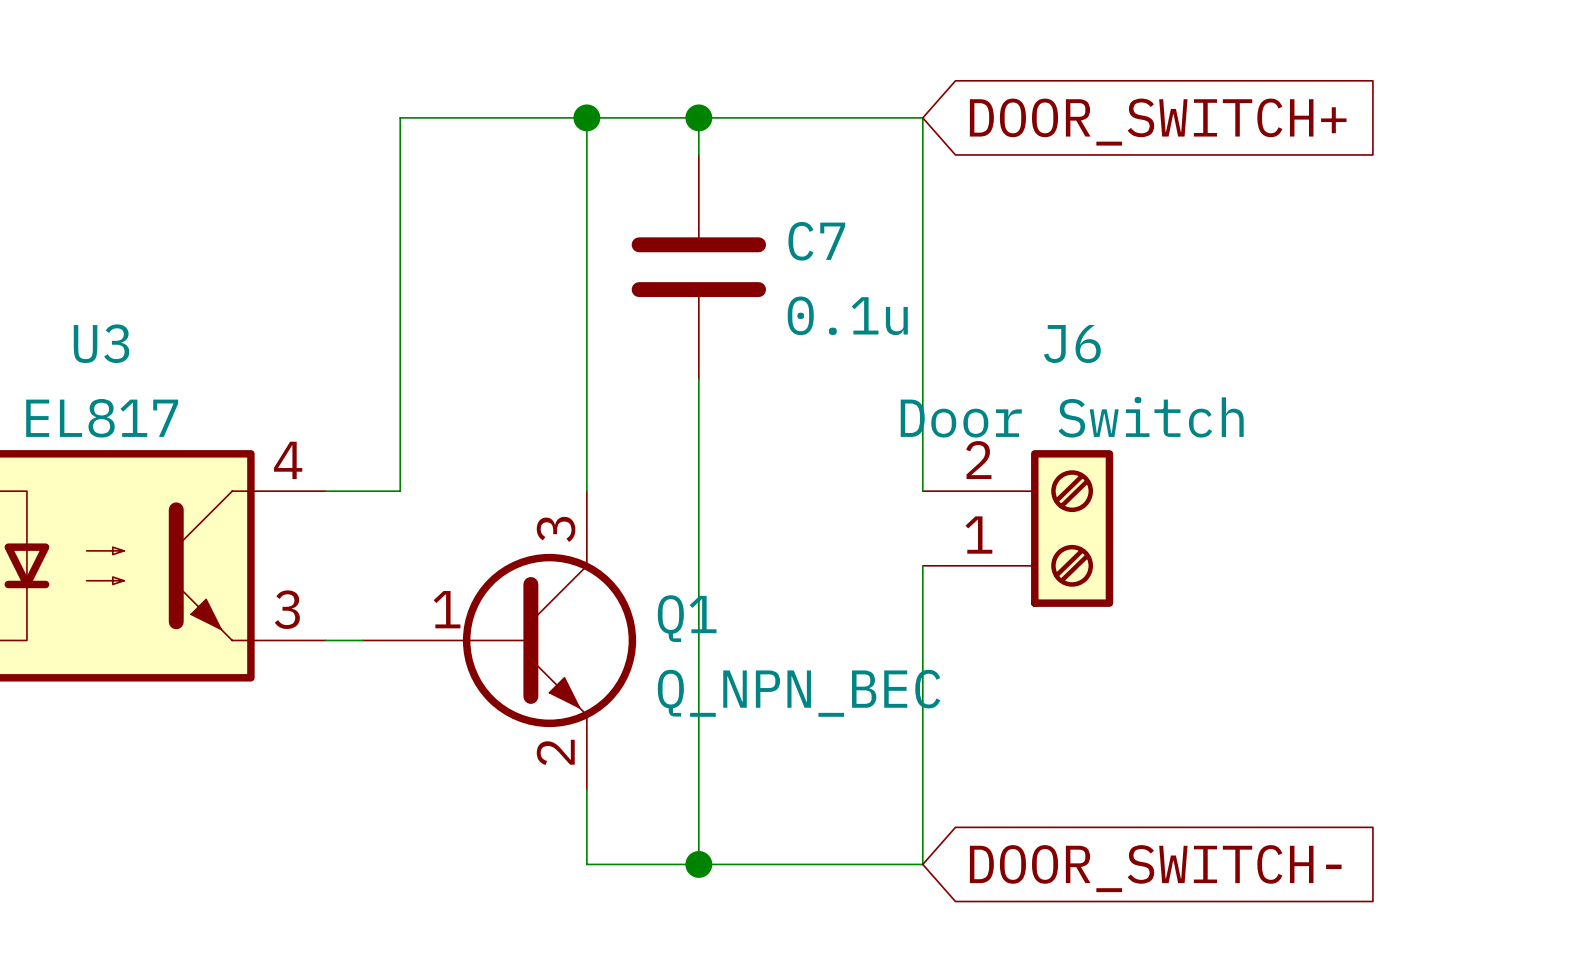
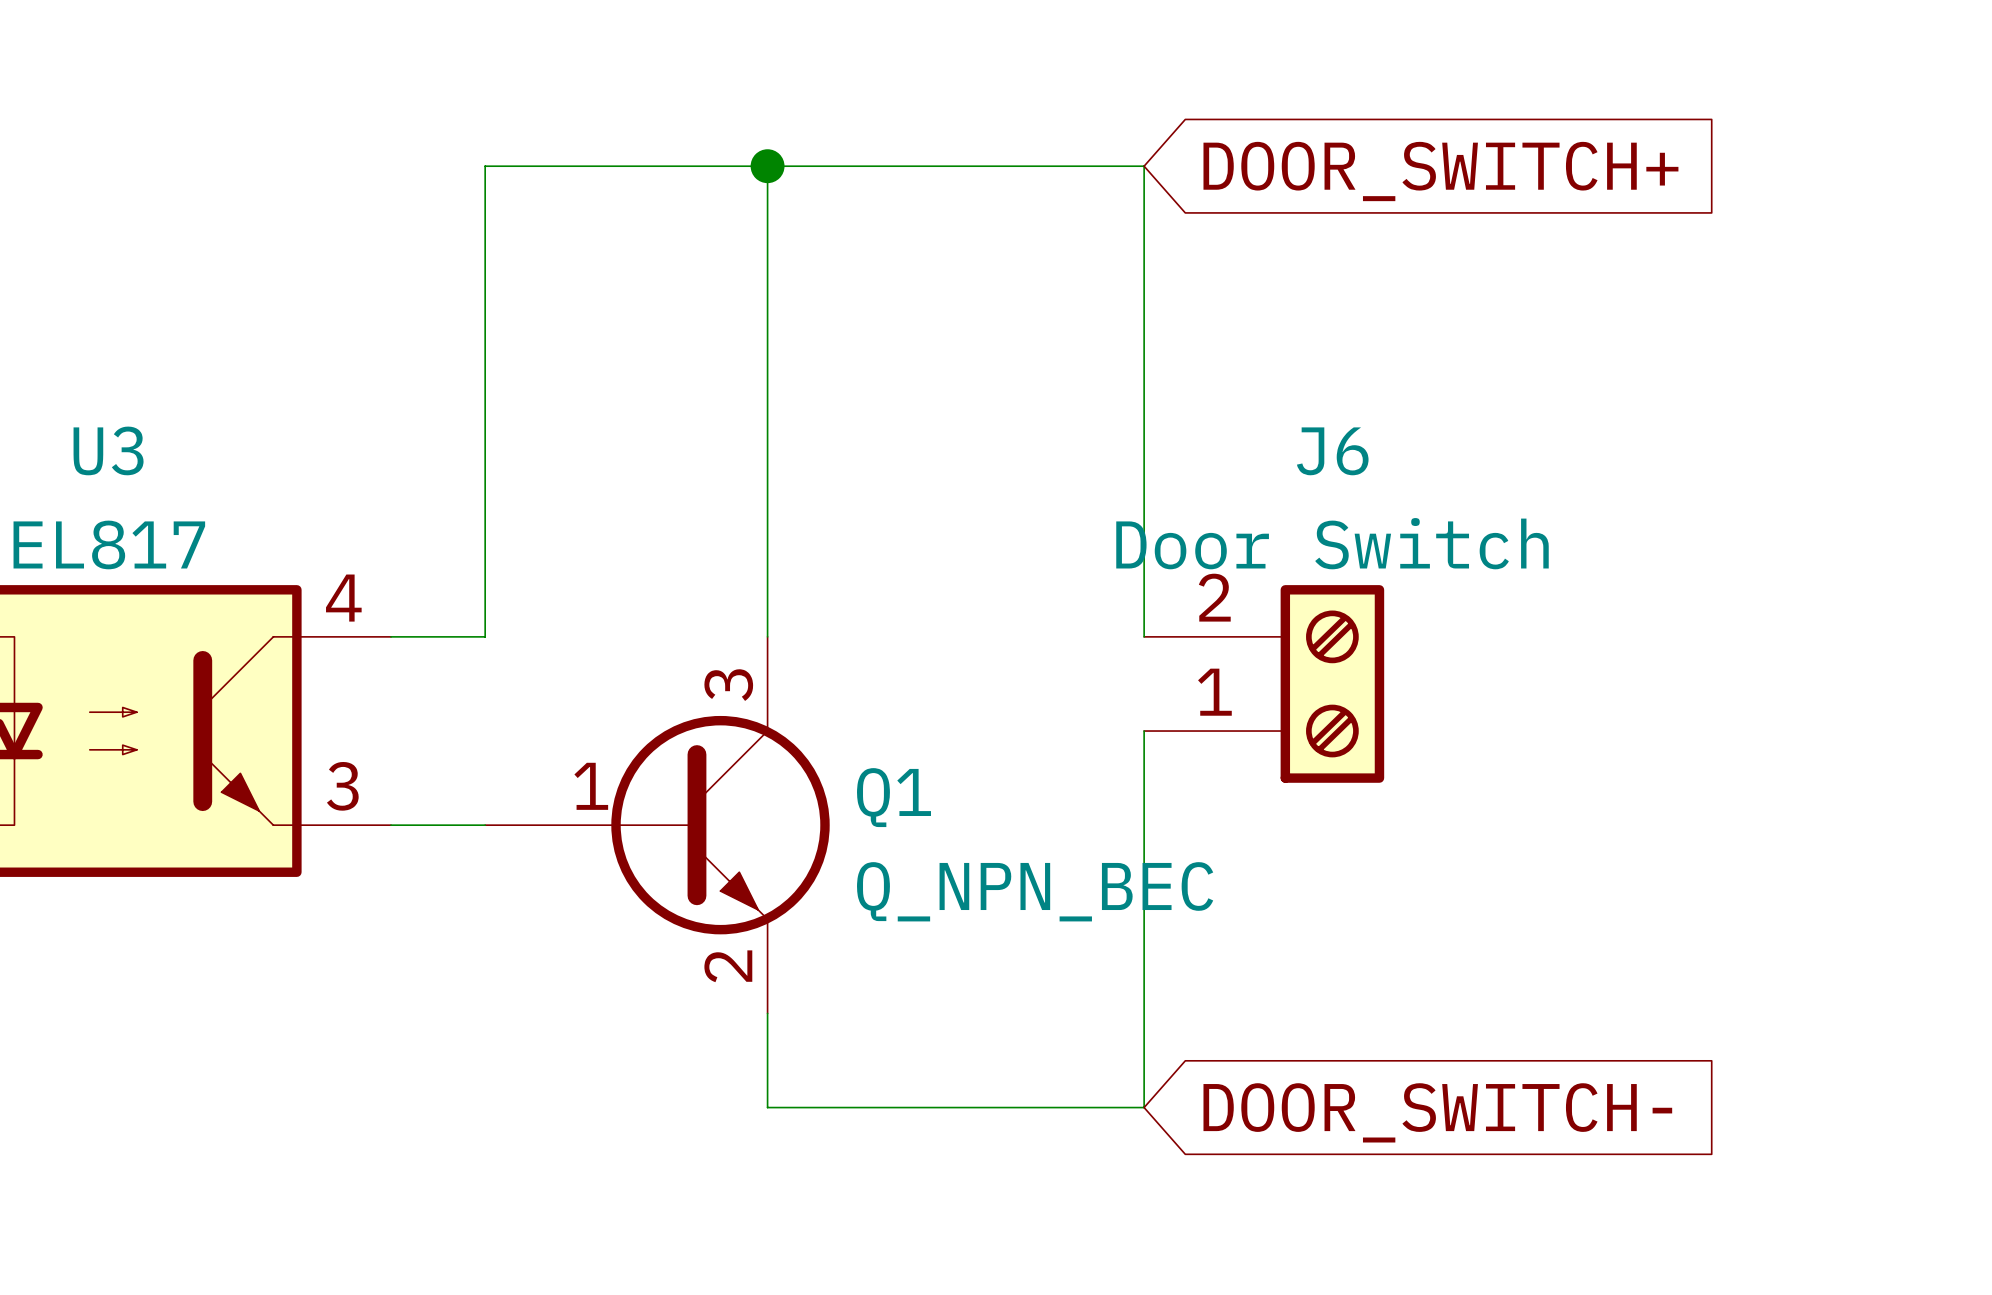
wire: (586, 117) (586, 491) -> (767, 166) (767, 636)
junction: (586, 117) -> none
junction: none -> (767, 166)
wire: (698, 117) (698, 155) -> none
junction: (698, 117) -> none
C7: 0.1u (698, 267) -> none
wire: (698, 379) (698, 864) -> none
Q1 position: (499, 640) -> (657, 825)
wire: (586, 789) (586, 864) (624, 864) -> (767, 1013) (767, 1107)
junction: (698, 864) -> none

